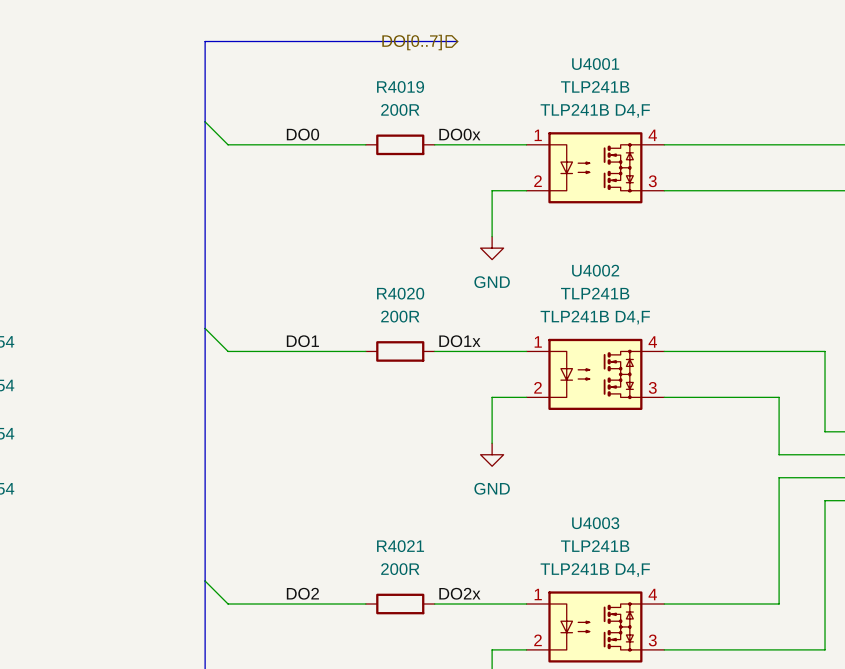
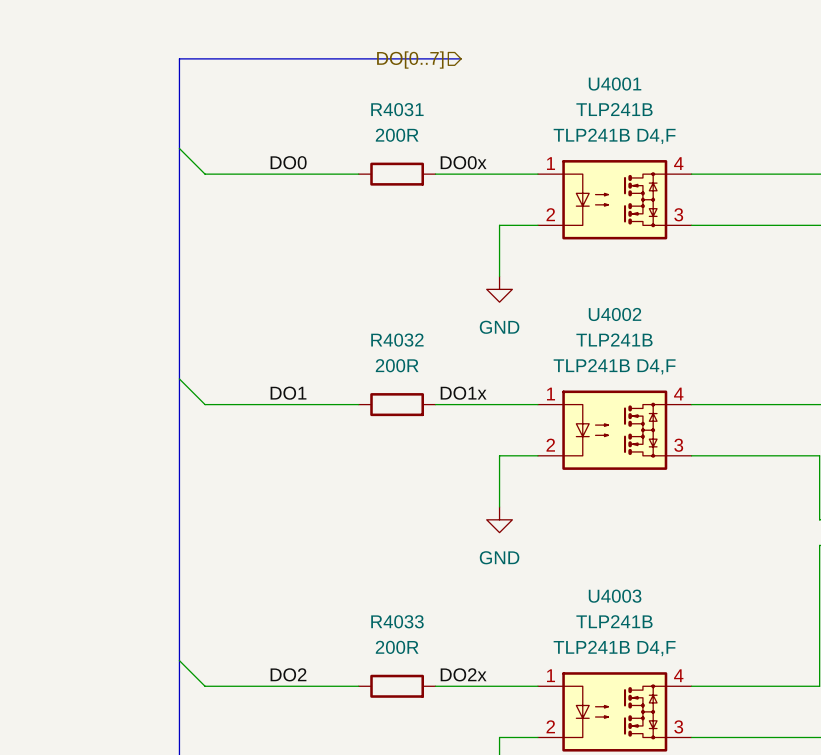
R4019 name: R4019 (400, 86) -> R4031 (397, 109)
R4020 name: R4020 (400, 293) -> R4032 (397, 340)
R4021 name: R4021 (400, 546) -> R4033 (397, 621)

